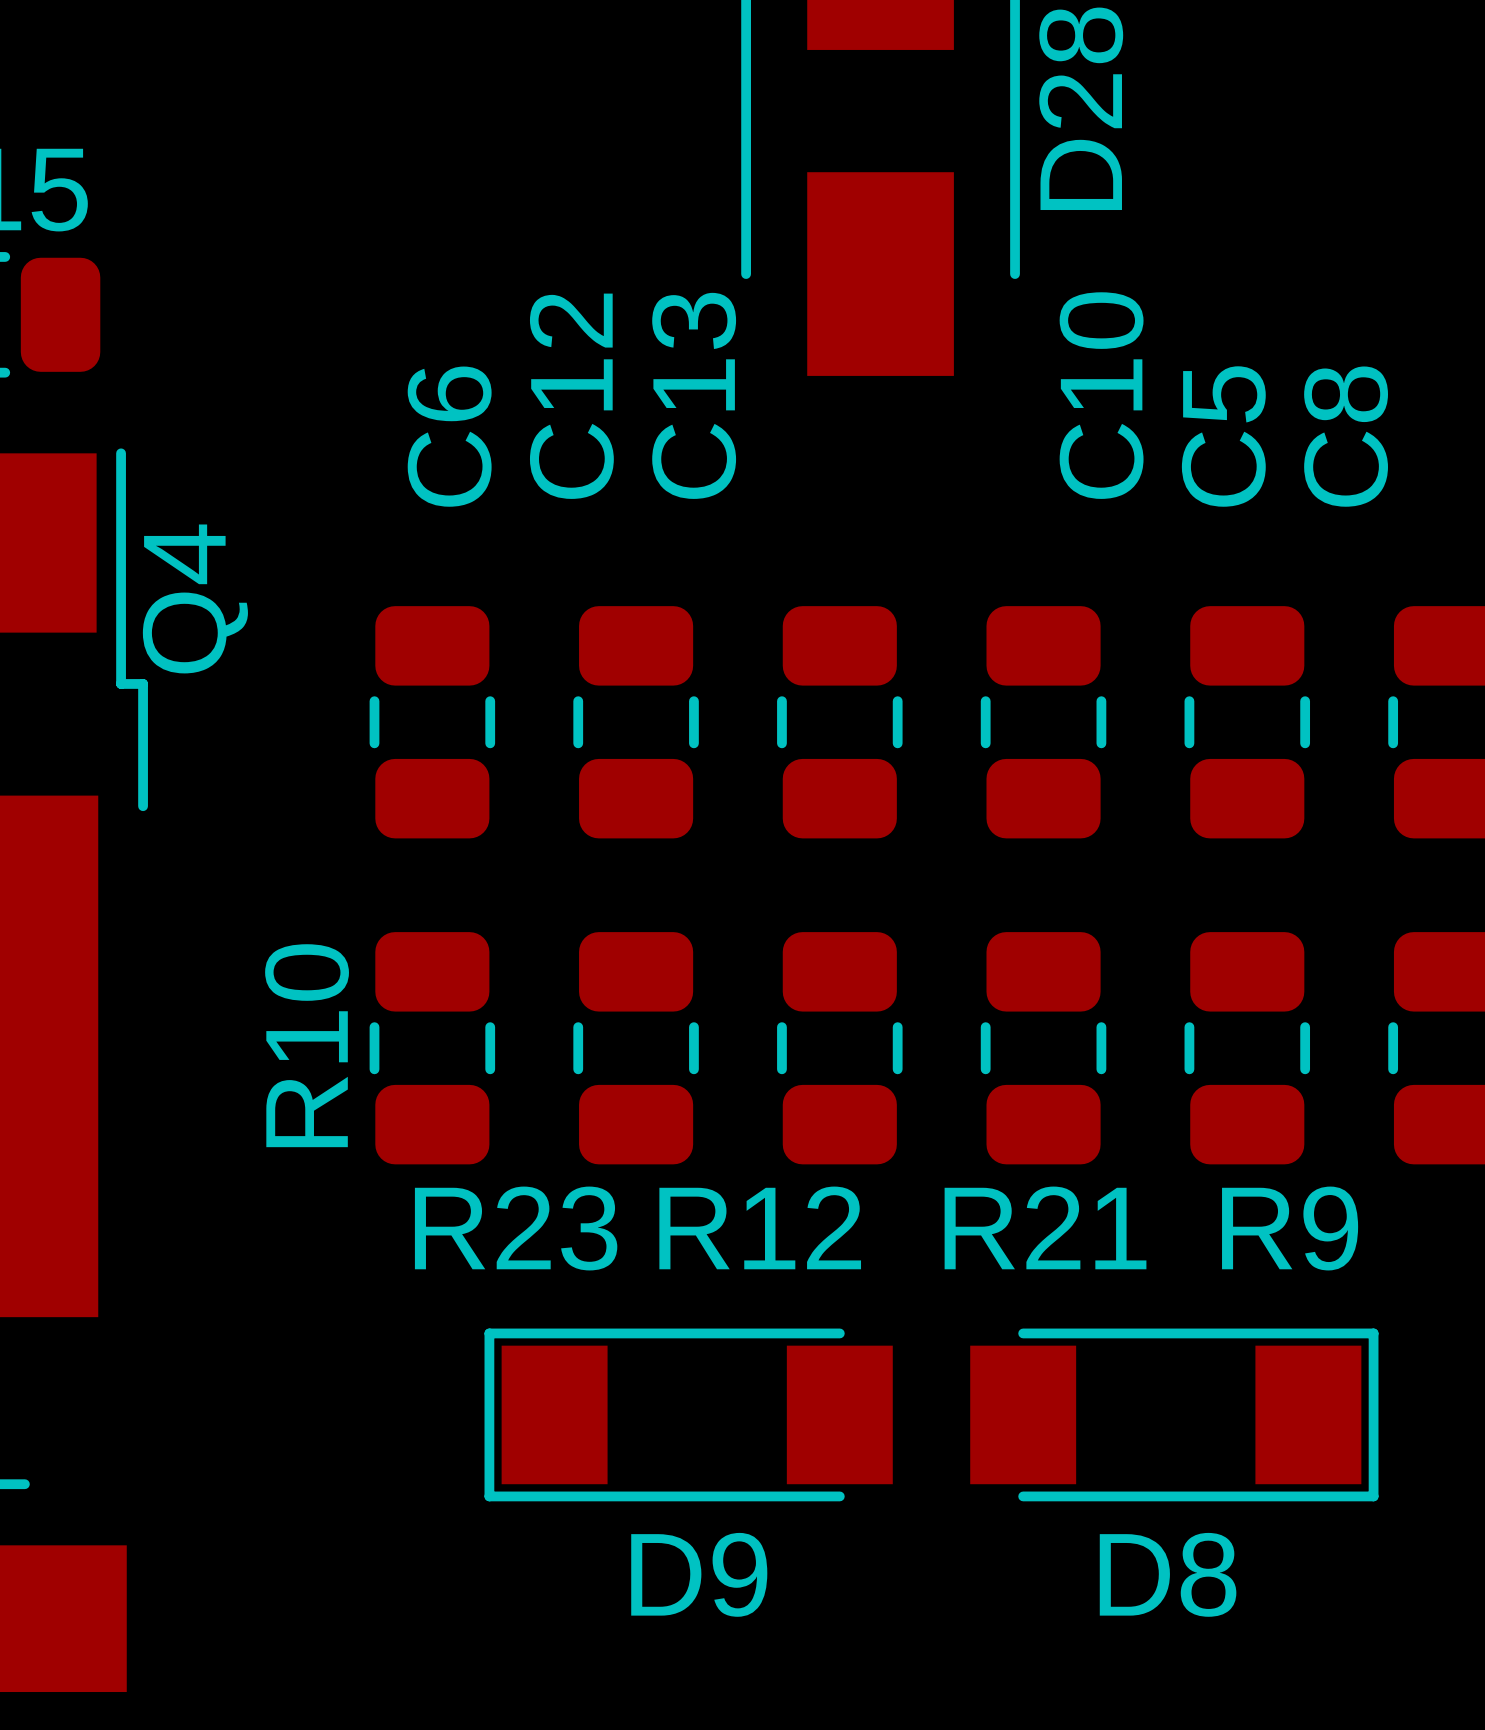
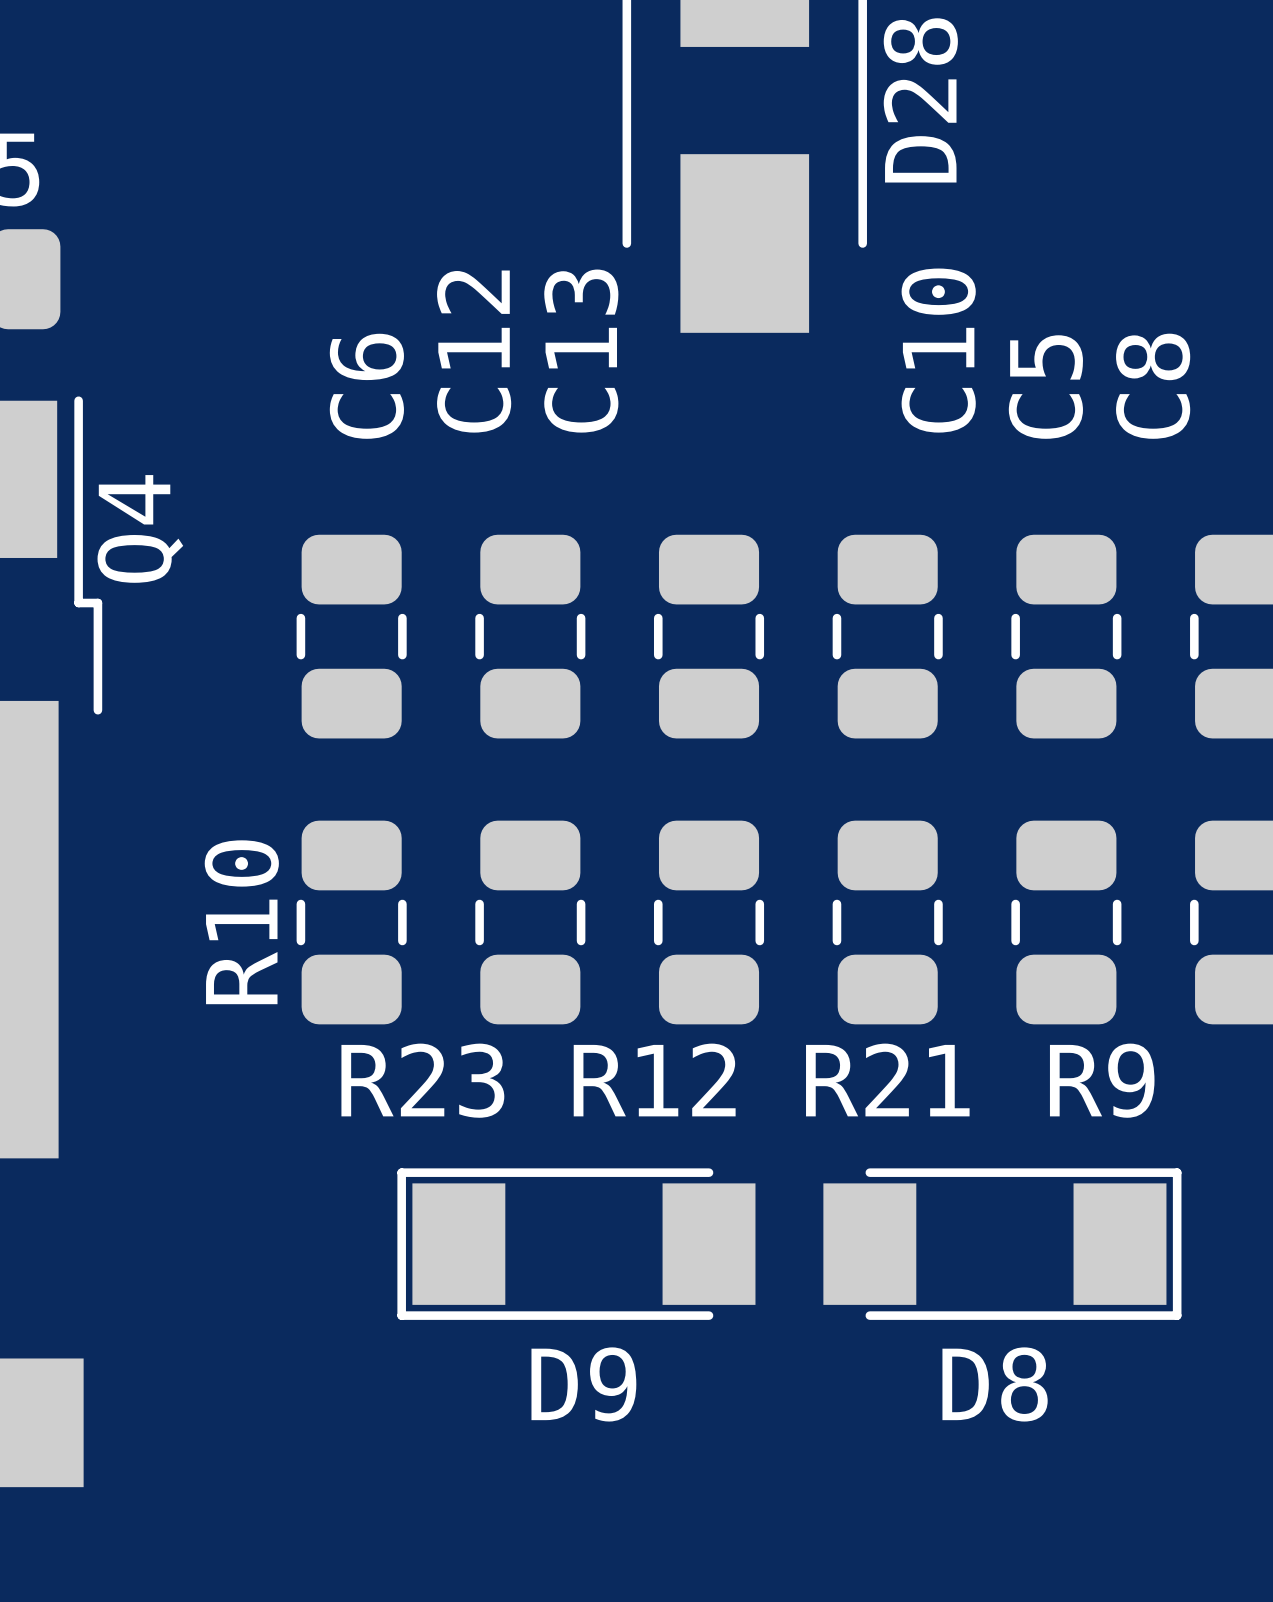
R12 name position: R12 (760, 1227) -> R12 (654, 1080)

